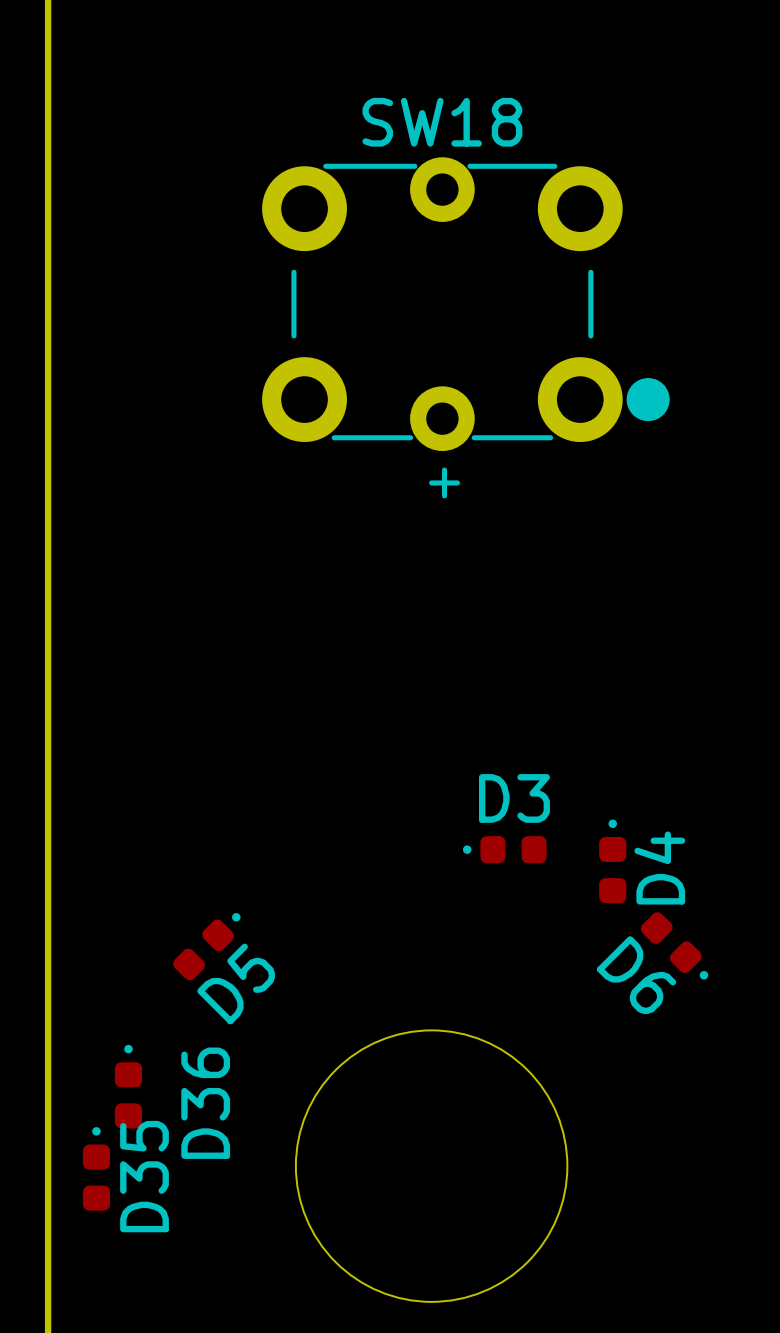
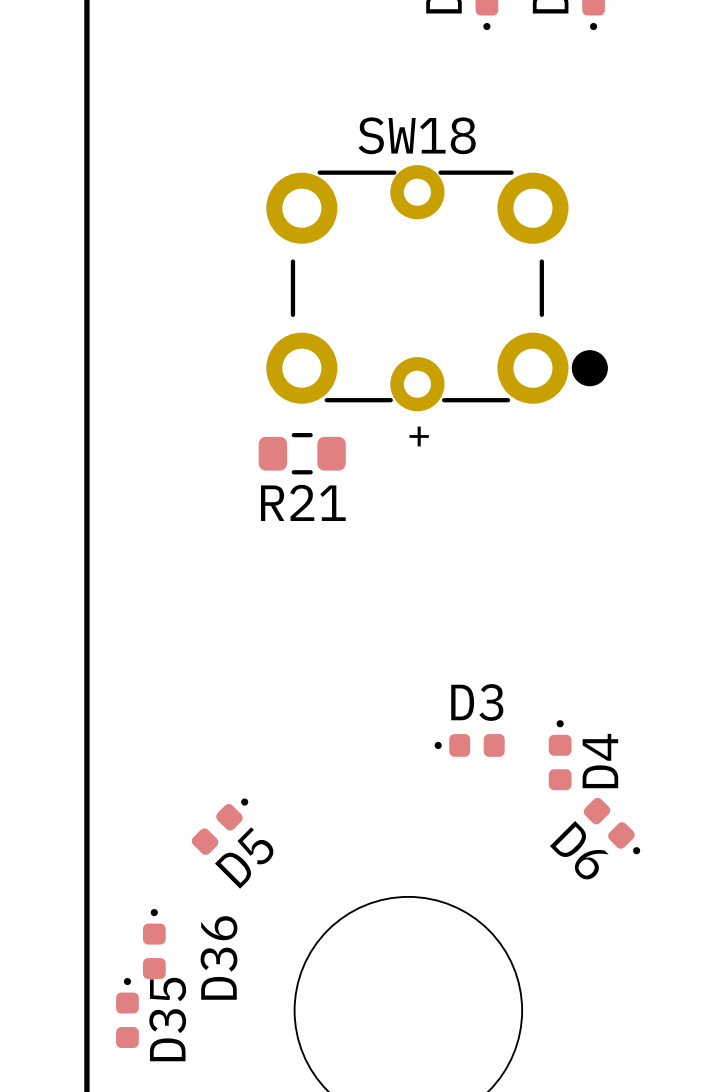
R21: none -> (302, 453)

